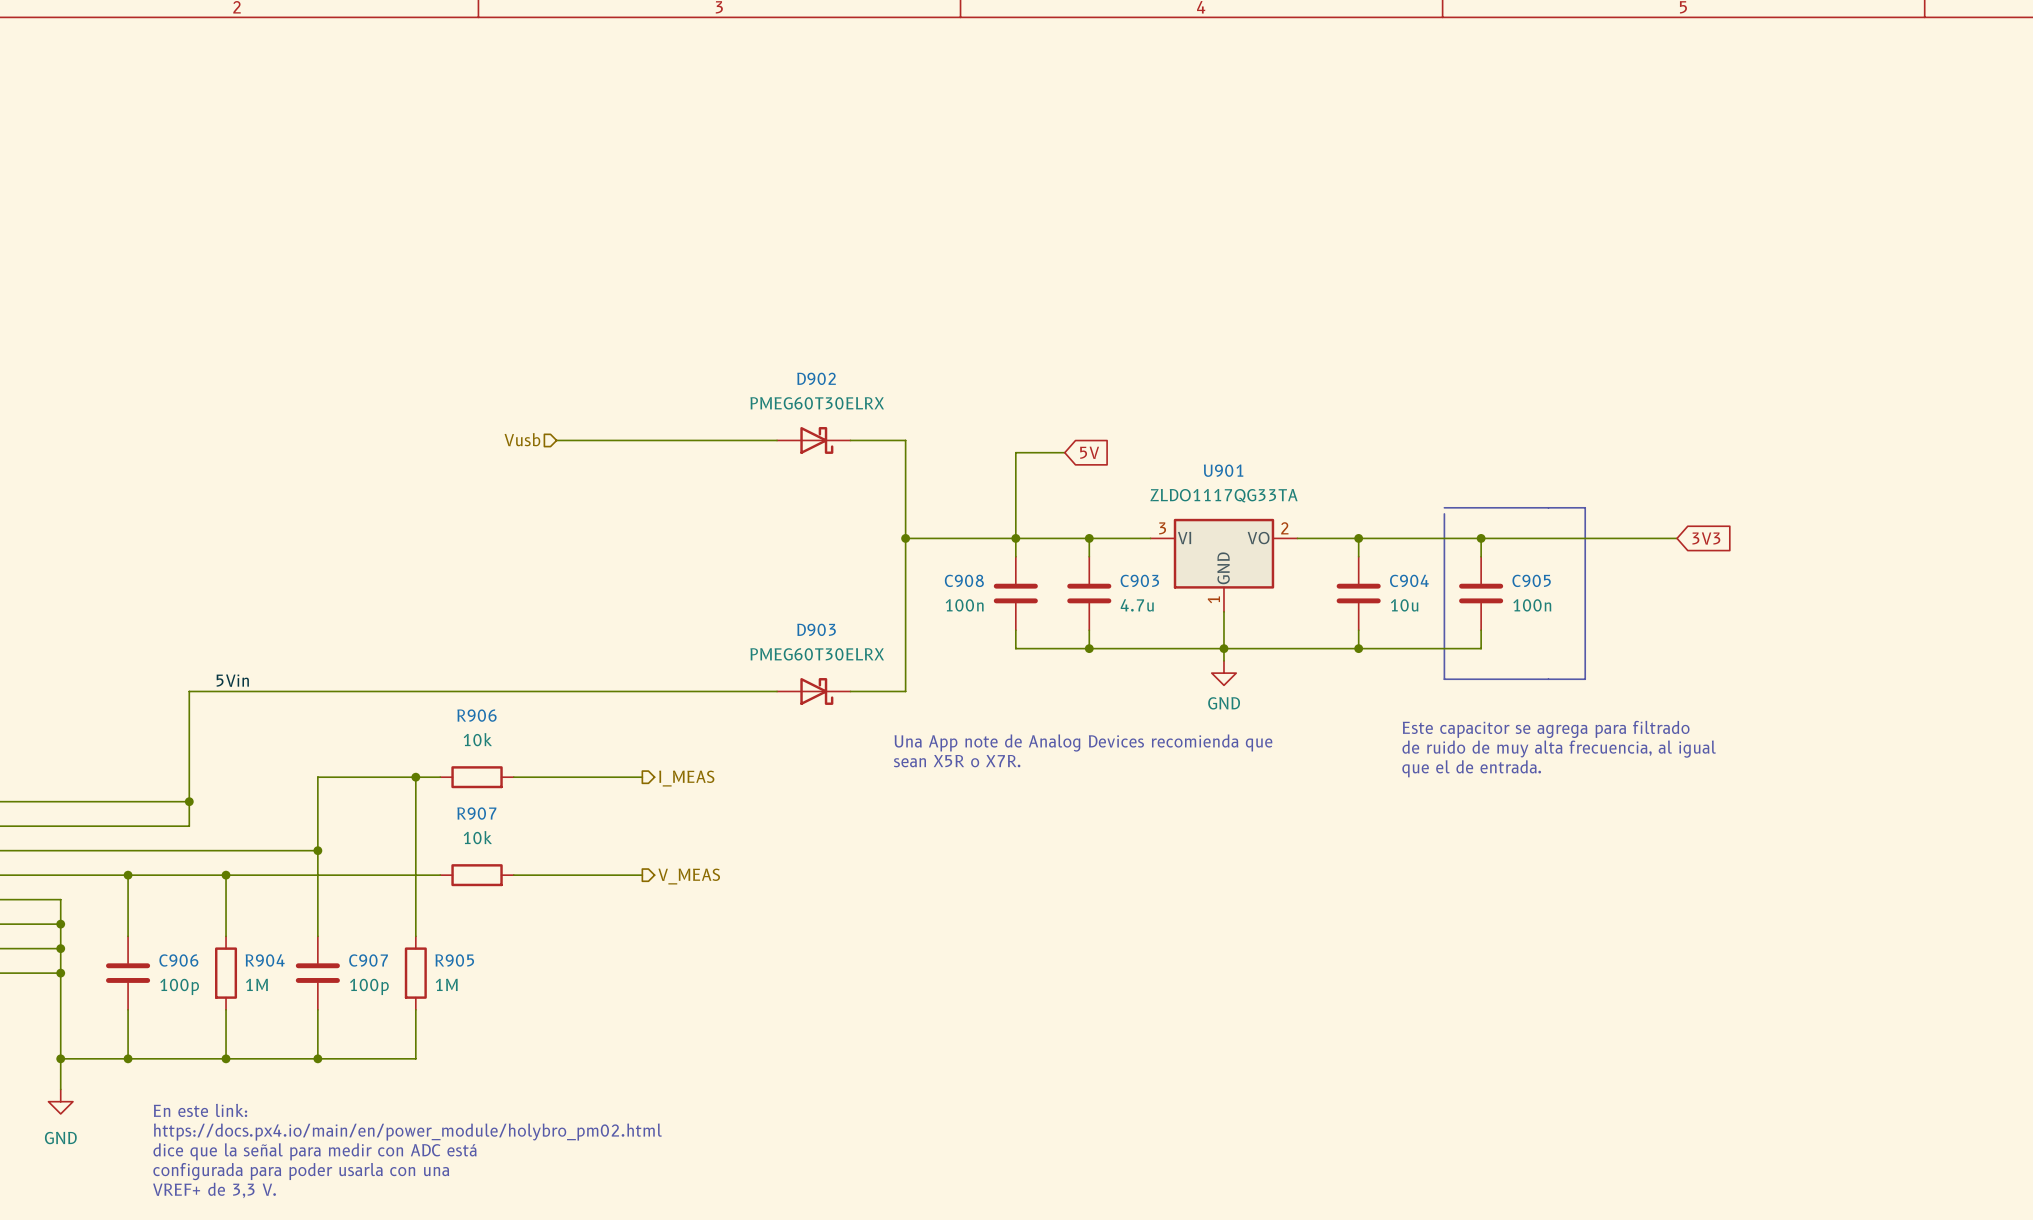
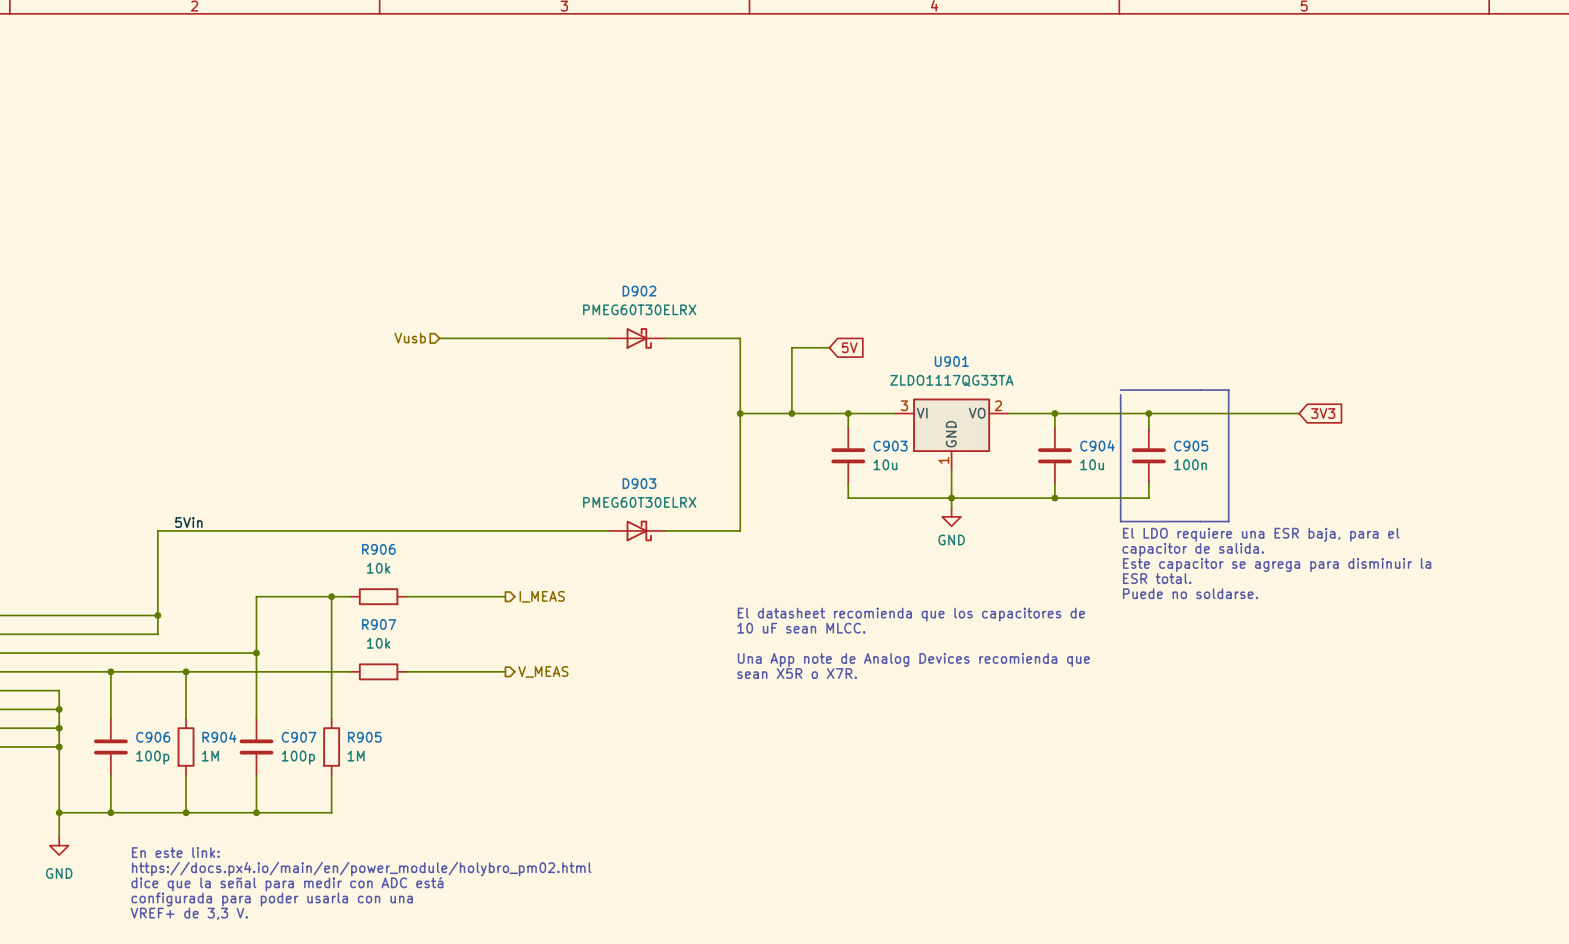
wire: (905, 440) (905, 691) -> (707, 338) (740, 338) (740, 530) (707, 530)
wire: (905, 538) (948, 538) -> none
junction position: (905, 538) -> (740, 413)
wire: (1015, 538) (1015, 556) -> none
C908: 100n (1015, 593) -> none
C903 value: 4.7u (1137, 605) -> 10u (885, 464)
wire: (1015, 630) (1015, 648) (1089, 648) -> none
junction: (1089, 648) -> none
text: none -> El LDO requiere una ESR baja, para el (1261, 534)
text: none -> capacitor de salida. (1193, 549)
text: Este capacitor se agrega para filtrado (1546, 729) -> Este capacitor se agrega para disminuir la (1277, 565)
text position: Una App note de Analog Devices recomienda que (1083, 743) -> Una App note de Analog Devices recomienda que (913, 659)
text: de ruido de muy alta frecuencia, al igual (1559, 749) -> none
text: none -> ESR total. (1157, 578)
text position: sean X5R o X7R. (957, 761) -> sean X5R o X7R. (797, 673)
text: que el de entrada. (1471, 768) -> none
text: none -> Puede no soldarse. (1190, 593)
text: none -> El datasheet recomienda que los capacitores de (911, 614)
text: none -> 10 uF sean MLCC. (801, 628)

